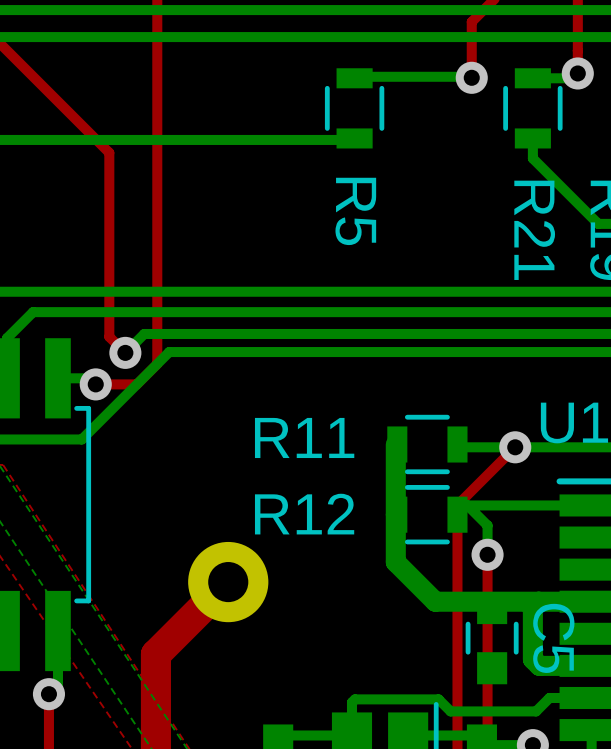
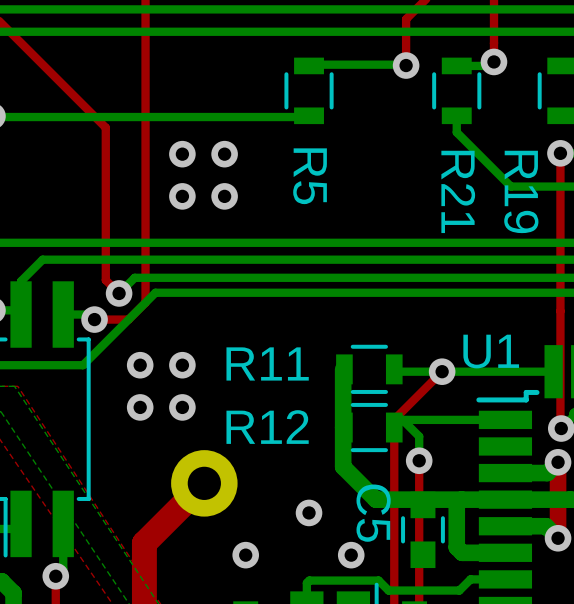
via: none -> (182, 154)
via: none -> (224, 154)
via: none -> (182, 196)
via: none -> (224, 196)
via: none -> (140, 365)
via: none -> (182, 365)
via: none -> (140, 407)
via: none -> (182, 407)
via: none -> (309, 512)
C5 name position: C5 (553, 638) -> C5 (373, 513)
via: none -> (245, 555)
via: none -> (351, 555)

